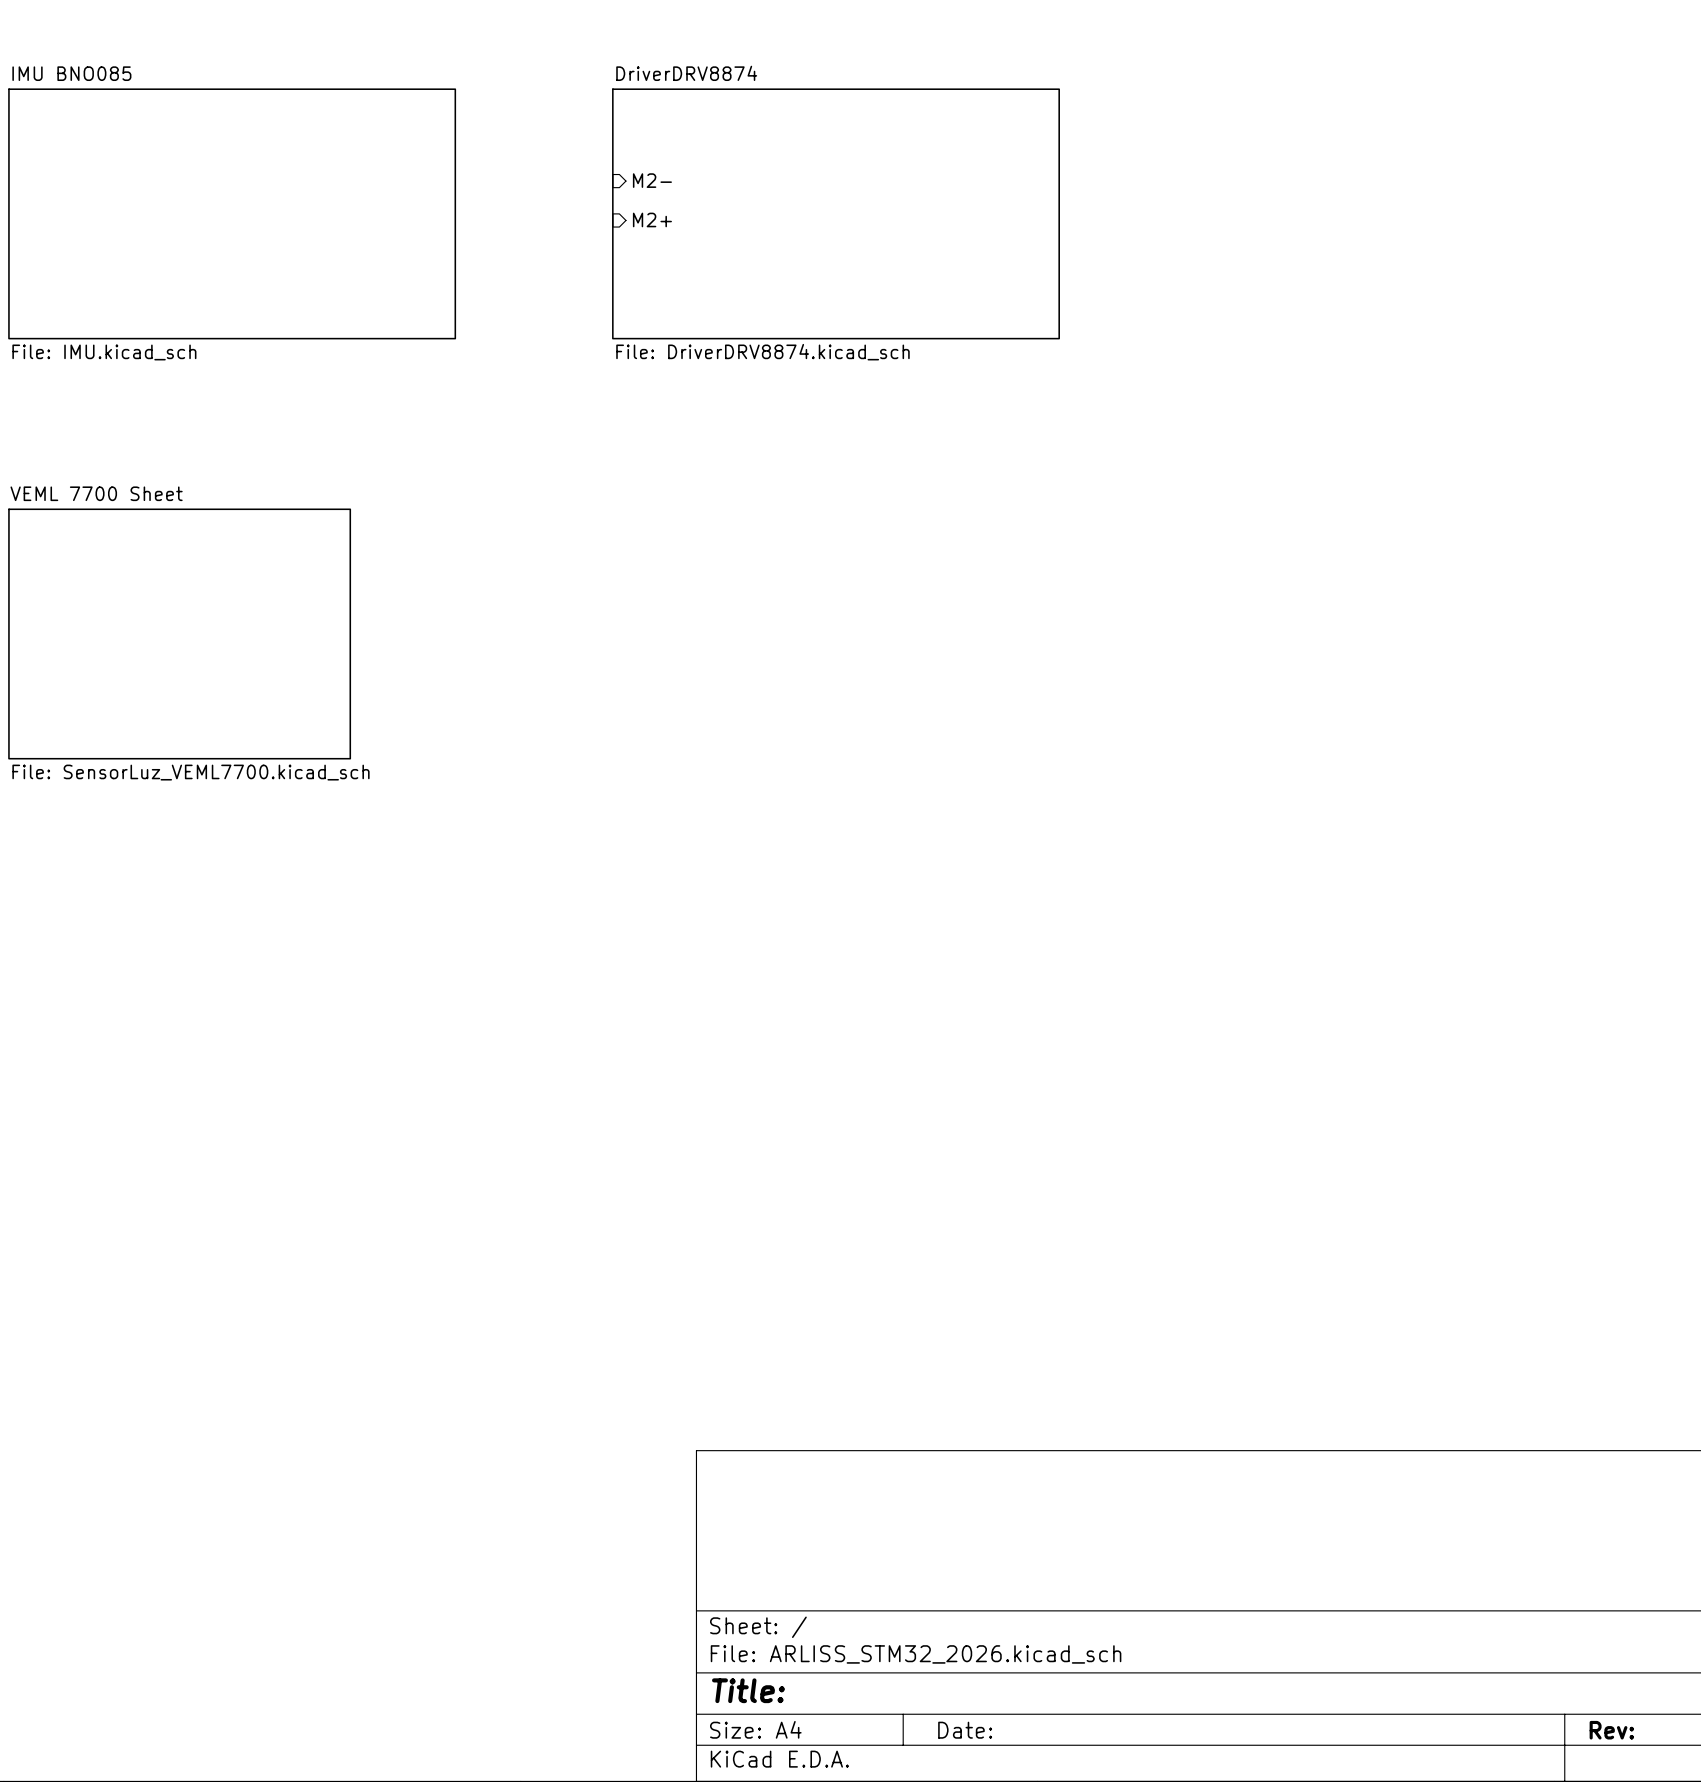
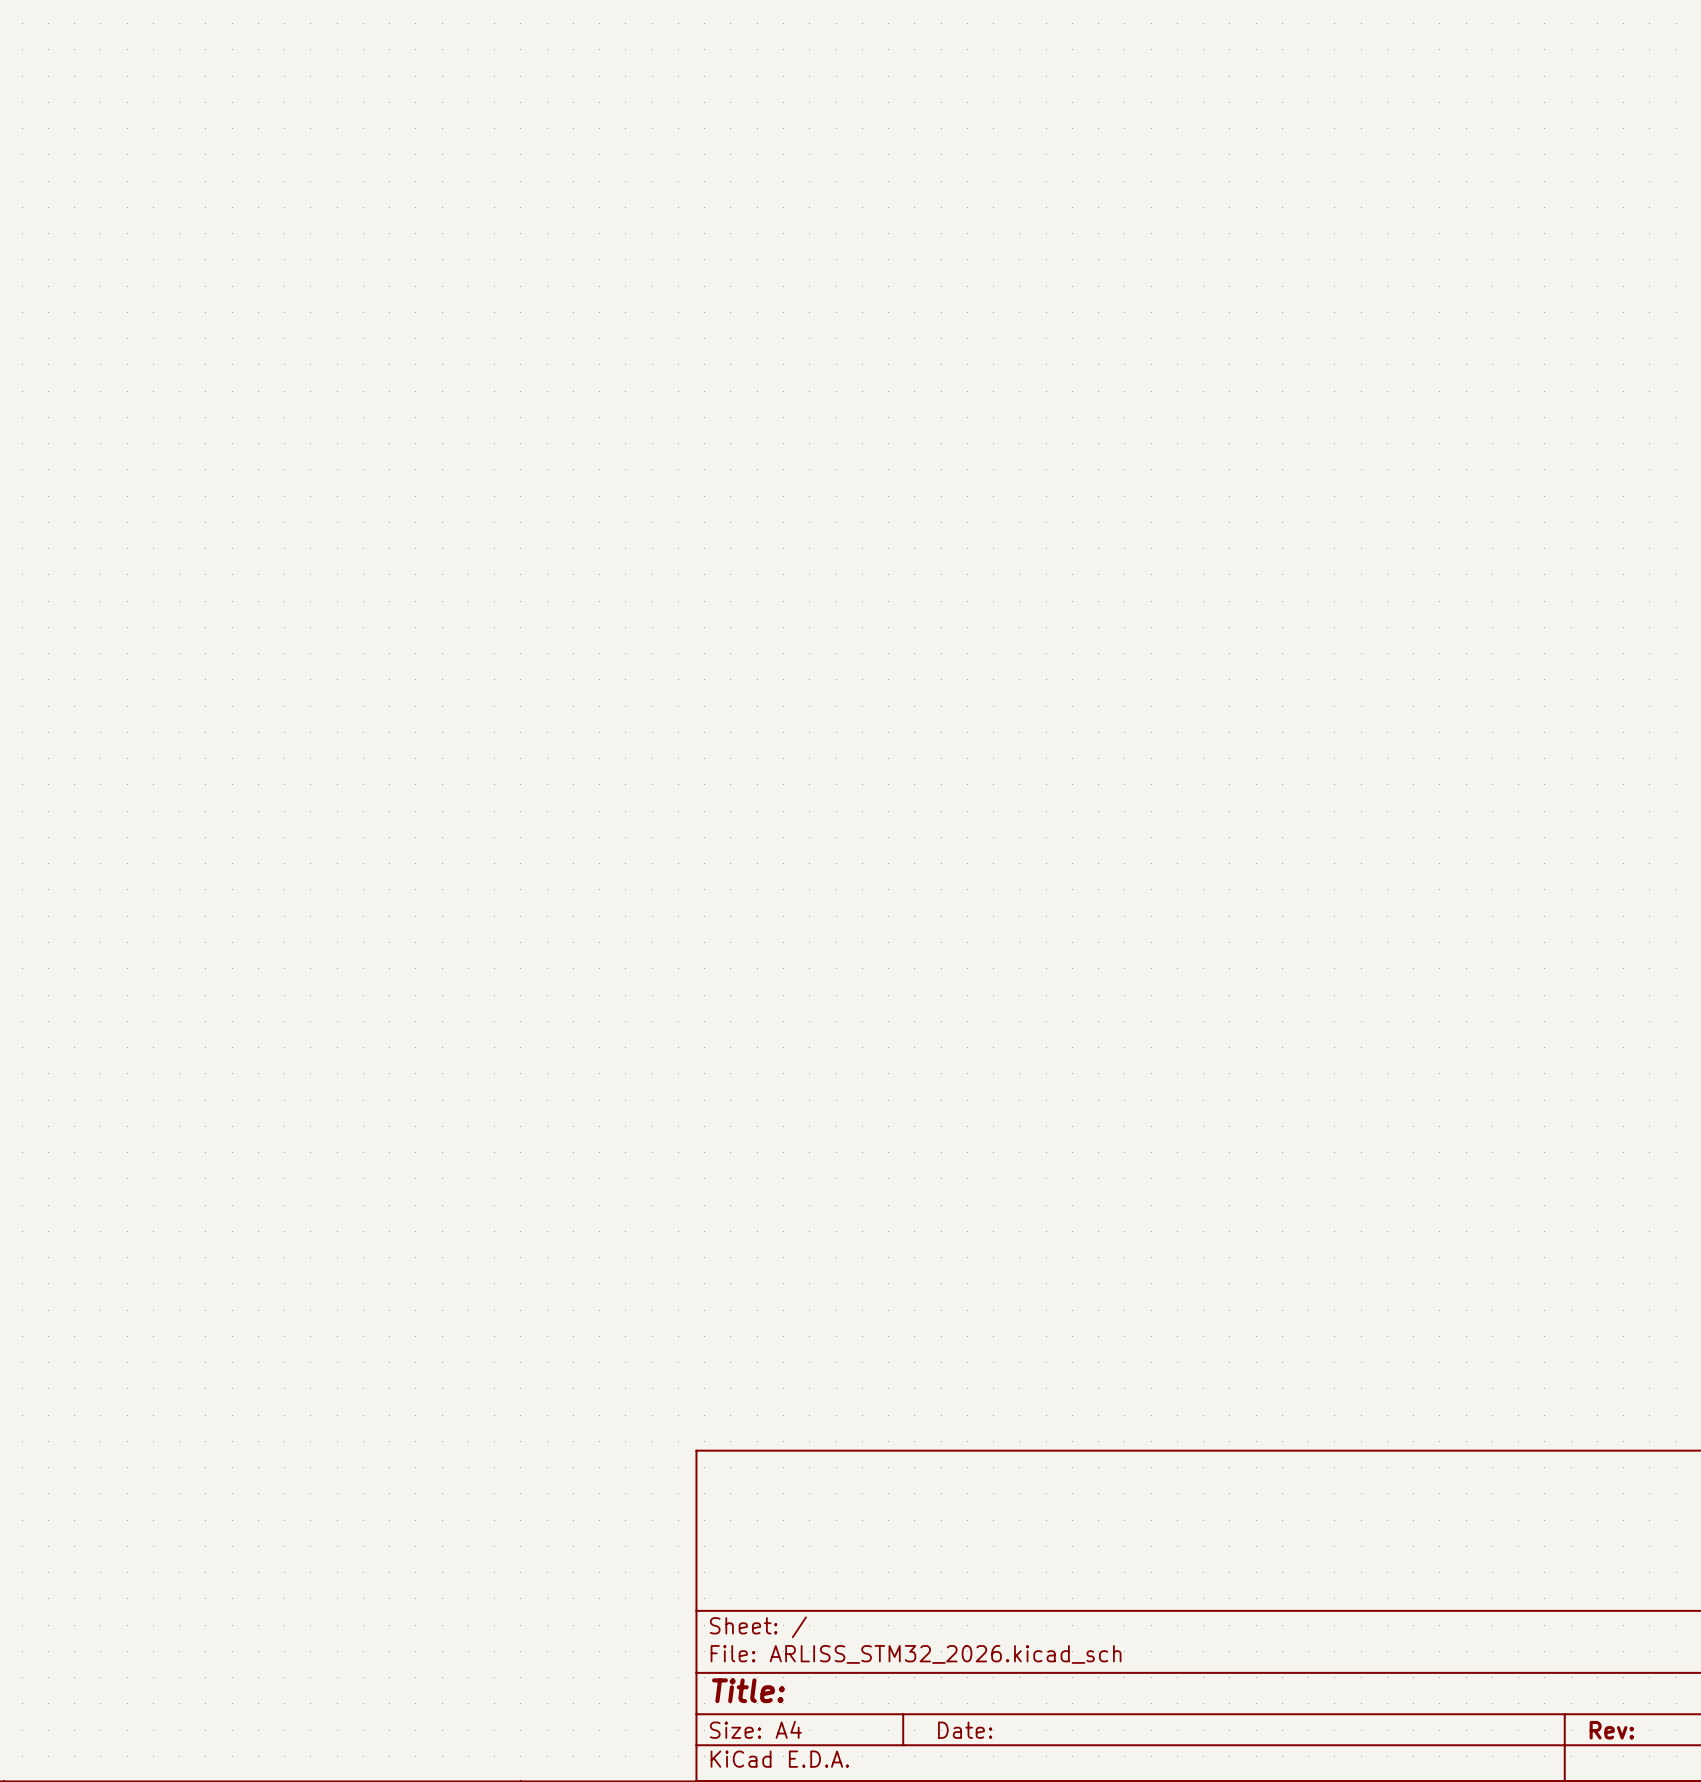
sheet pin: M2- (652, 180) -> none
sheet IMU BNO085: File: IMU.kicad_sch (232, 213) -> none
sheet DriverDRV8874: File: DriverDRV8874.kicad_sch (836, 213) -> none
sheet pin: M2+ (652, 219) -> none
sheet VEML 7700 Sheet: File: SensorLuz_VEML7700.kicad_sch (179, 633) -> none

